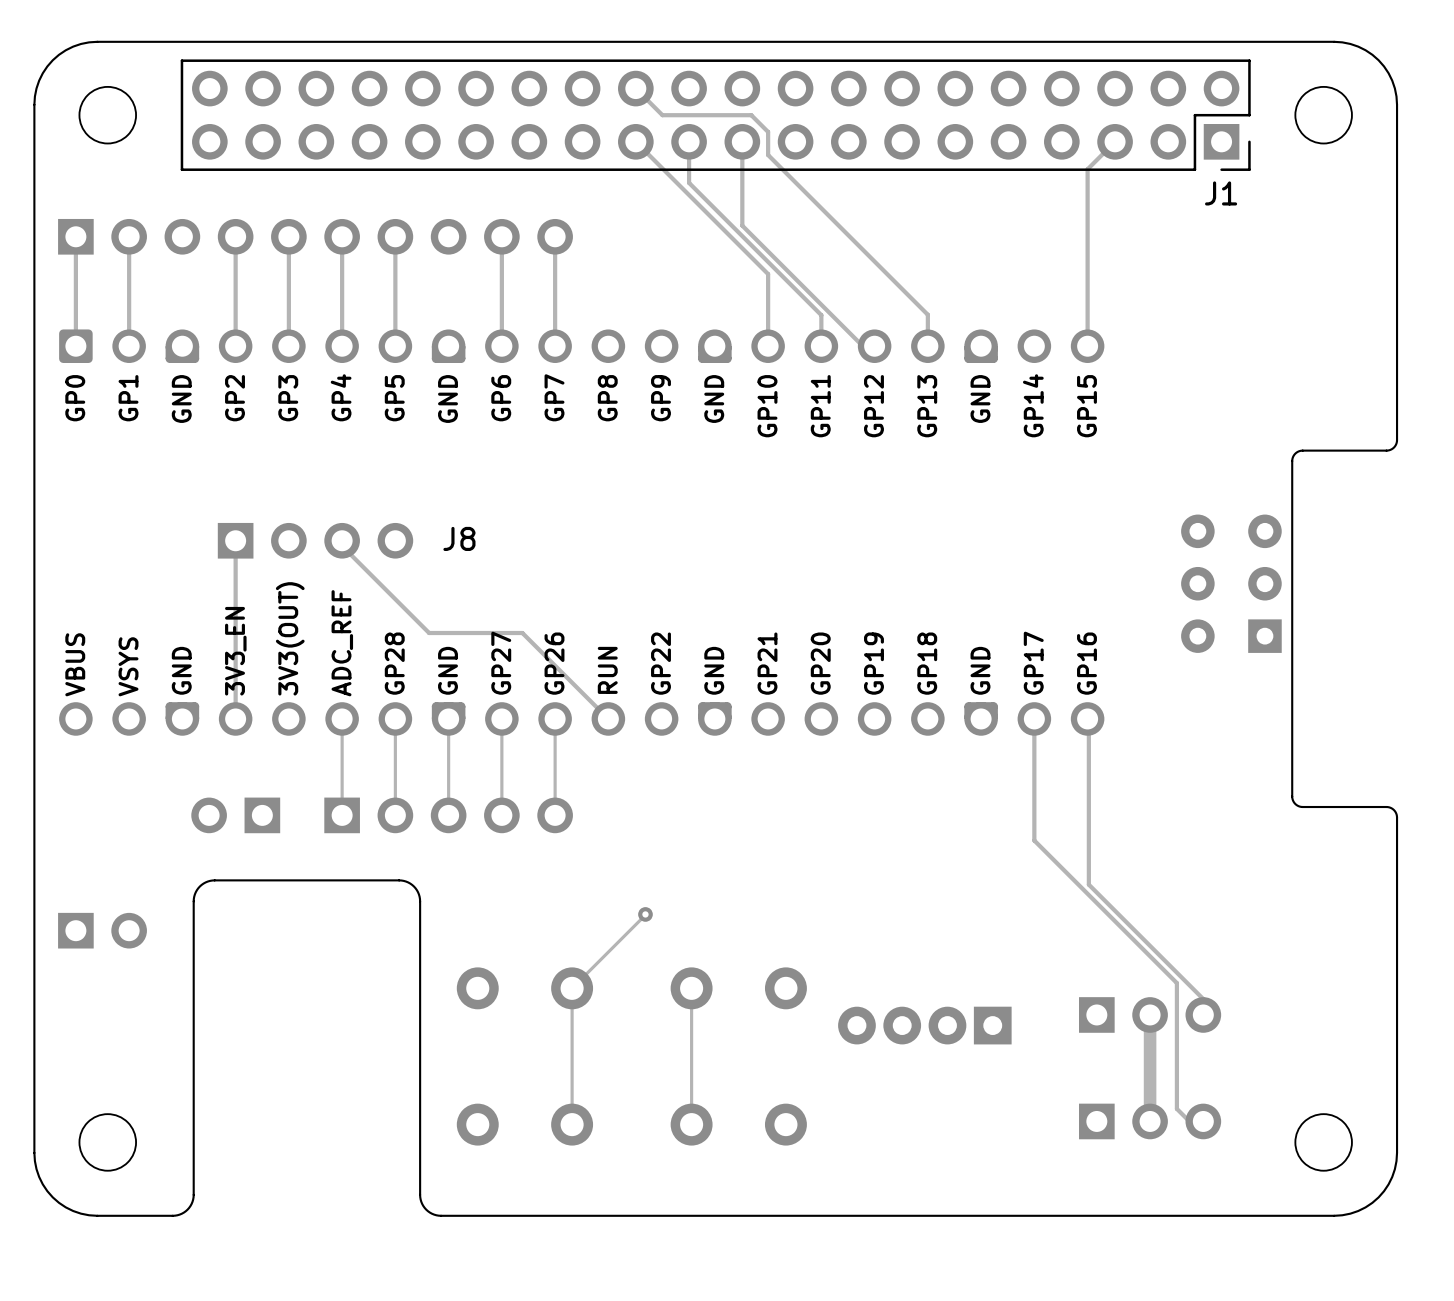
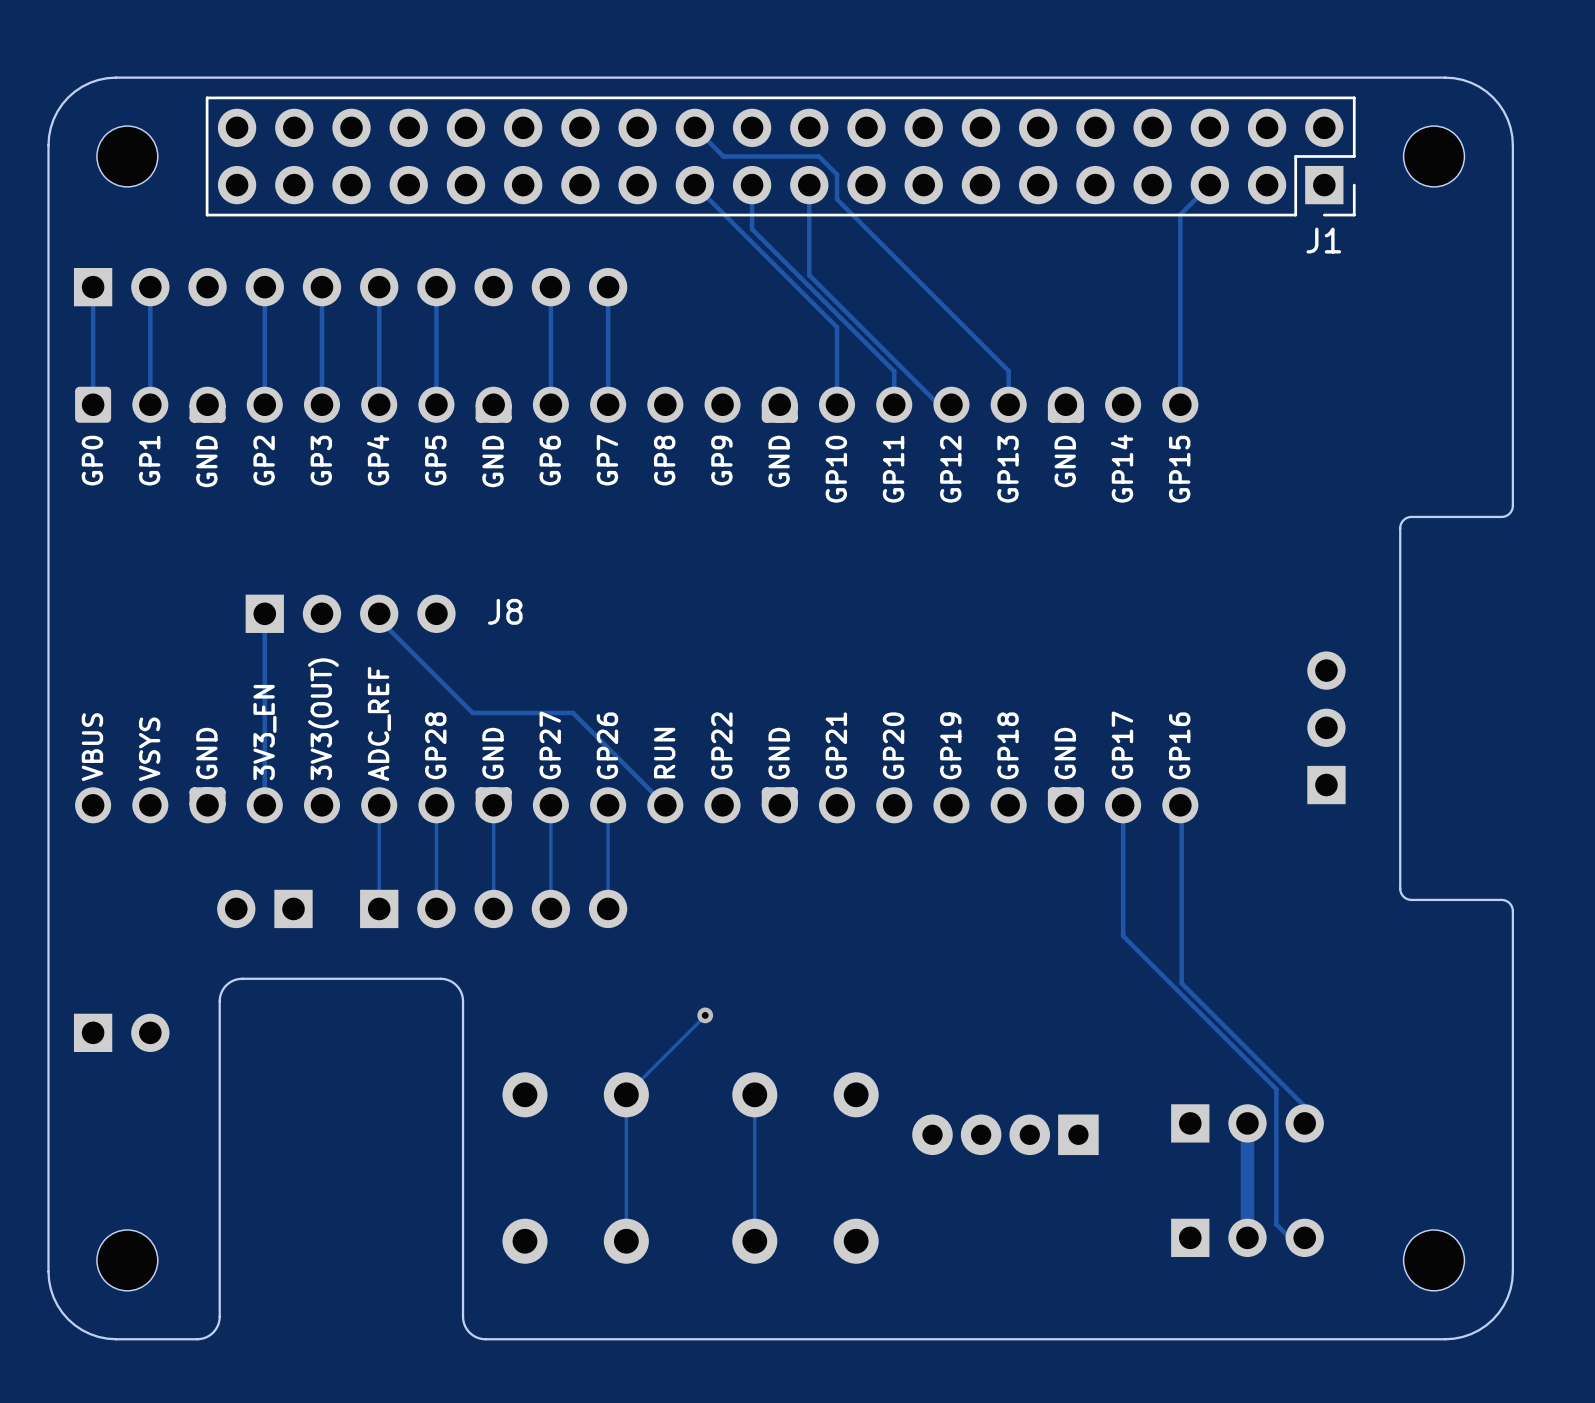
part: (1231, 583) -> none
part: none -> (1326, 727)

